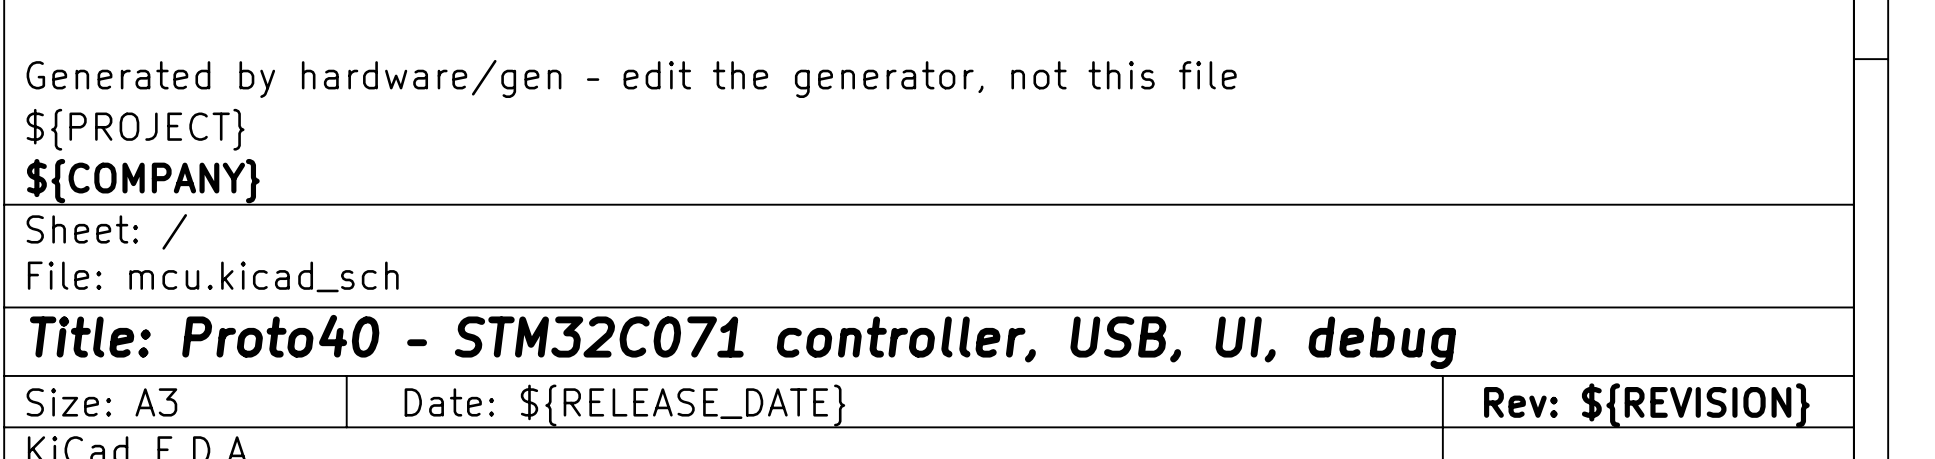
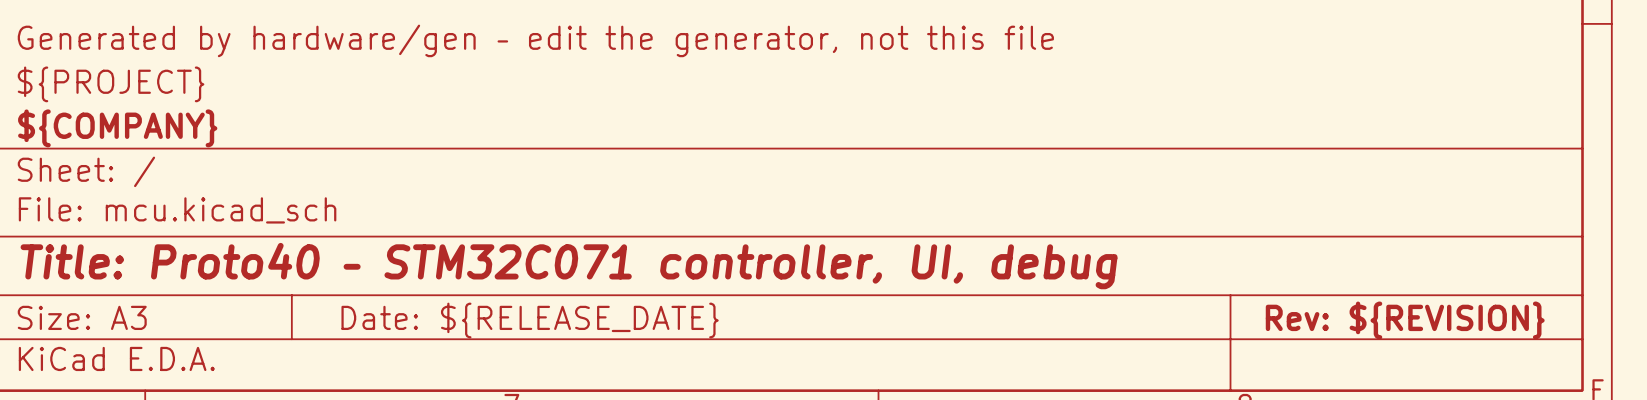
title block: Title: Proto40 – STM32C071 controller, USB, UI, debug (743, 341) -> Title: Proto40 – STM32C071 controller, UI, debug (569, 266)

